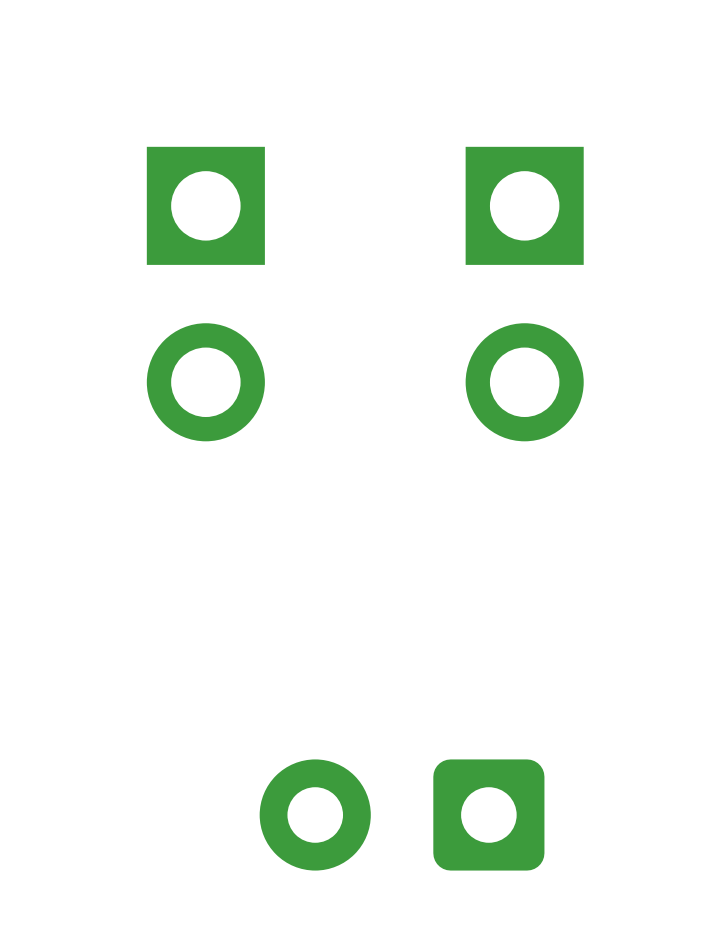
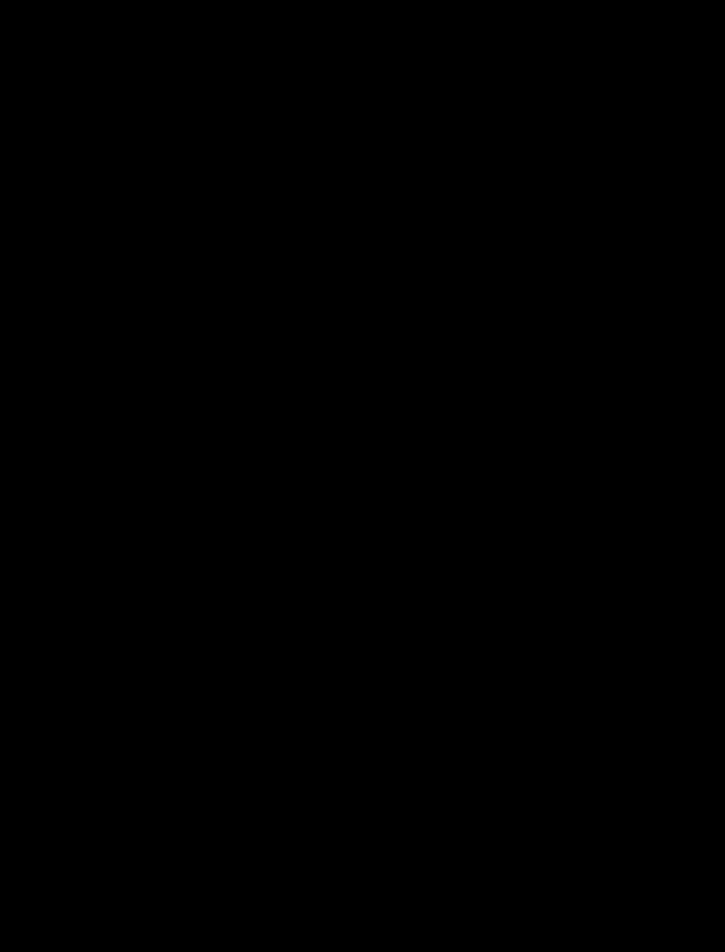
part: (205, 294) -> none
part: (524, 294) -> none
part: (402, 814) -> none

